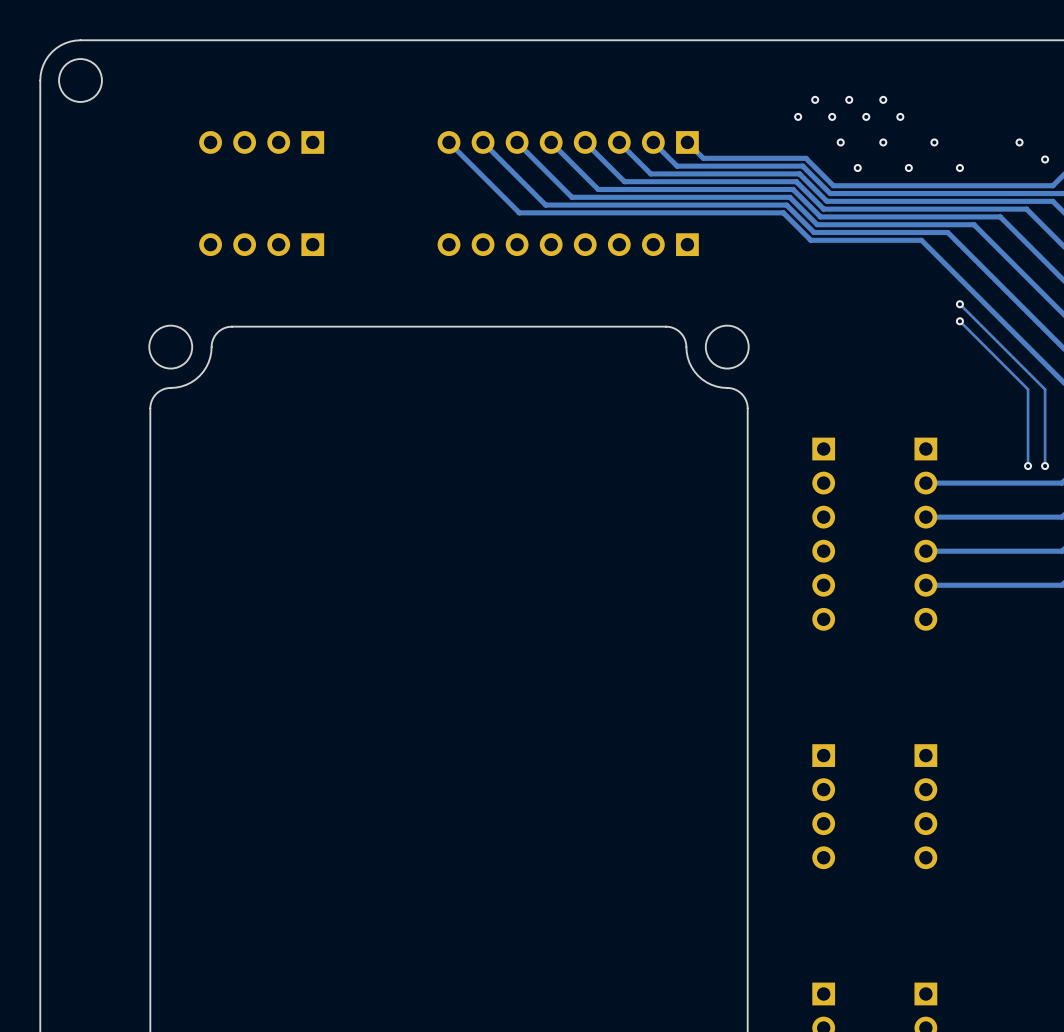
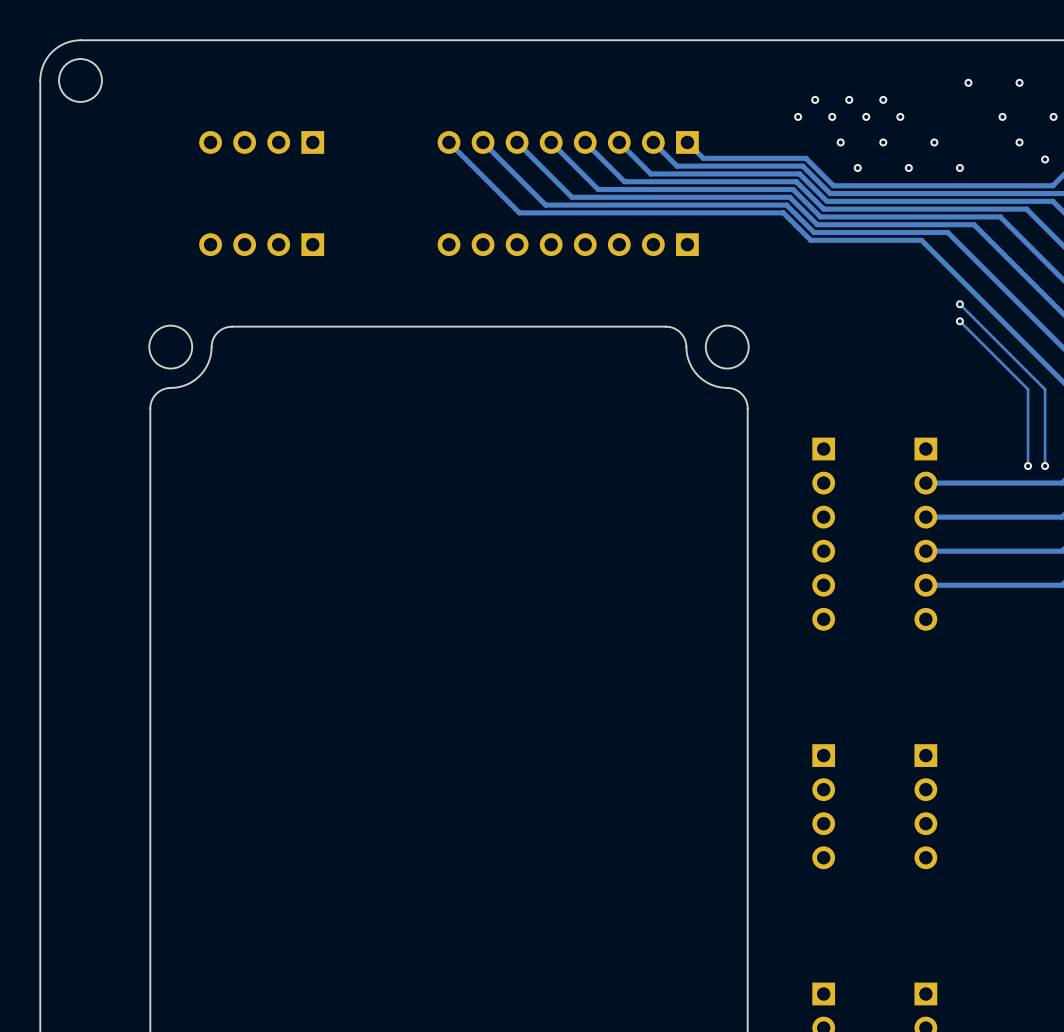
via: none -> (968, 82)
via: none -> (1019, 82)
via: none -> (1002, 116)
via: none -> (1053, 116)

